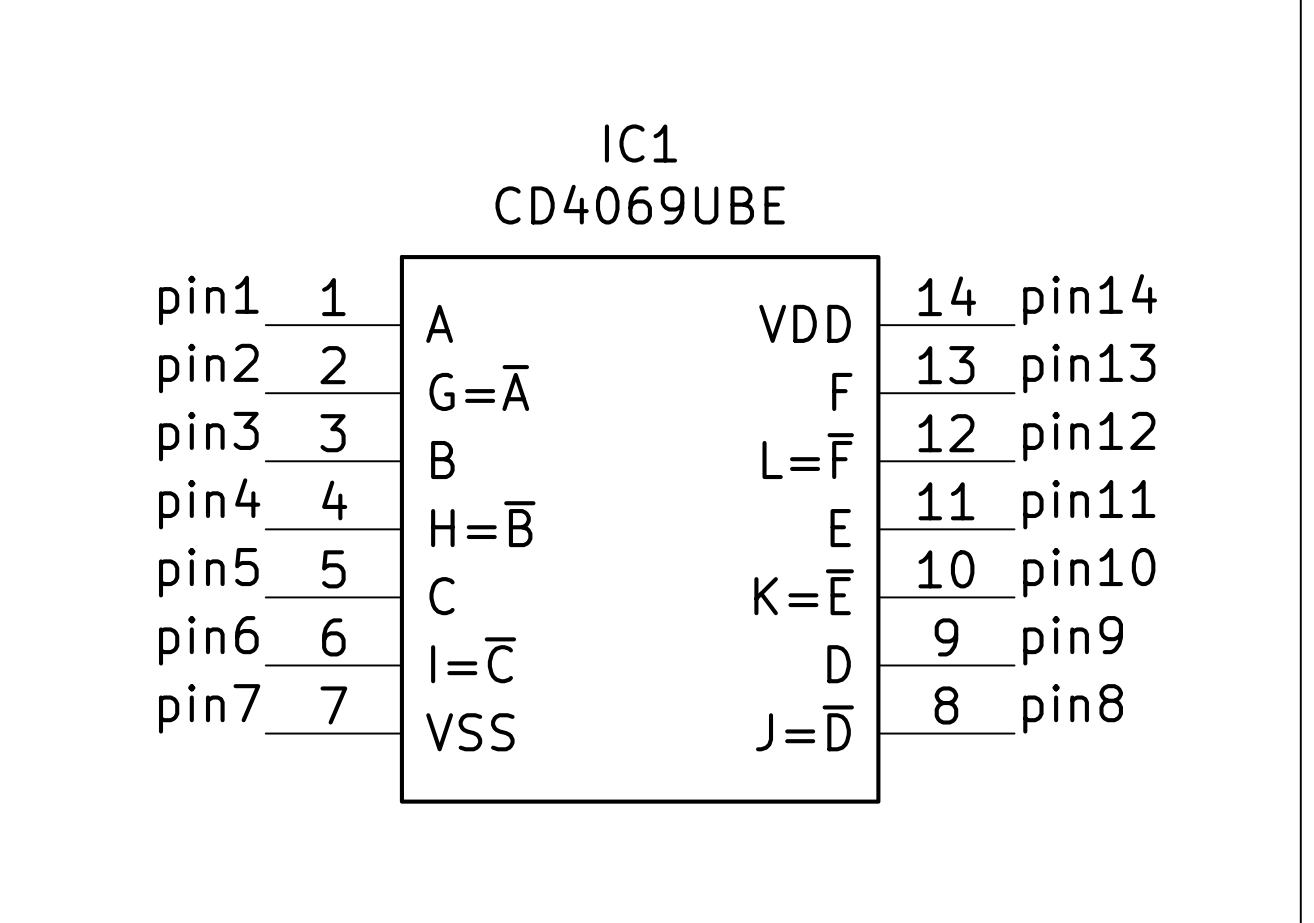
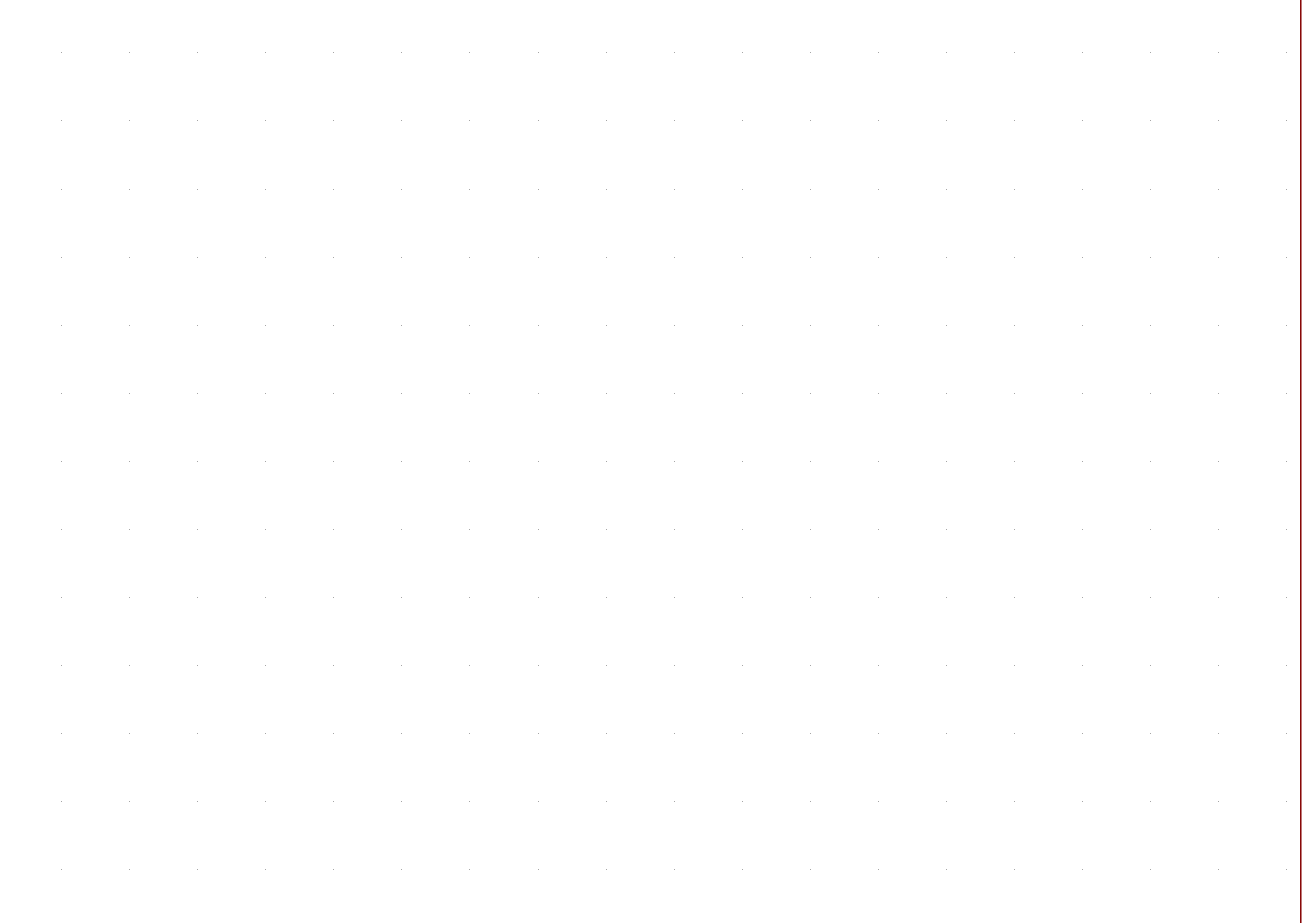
label: pin14 (1090, 299) -> none
label: pin1 (208, 300) -> none
label: pin2 (208, 368) -> none
label: pin13 (1089, 368) -> none
label: pin3 (208, 436) -> none
label: pin12 (1089, 436) -> none
label: pin4 (209, 503) -> none
label: pin11 (1089, 504) -> none
IC1: CD4069UBE (640, 529) -> none
label: pin5 (208, 572) -> none
label: pin10 (1089, 572) -> none
label: pin6 (208, 640) -> none
label: pin9 (1073, 640) -> none
label: pin7 (209, 708) -> none
label: pin8 (1073, 708) -> none

